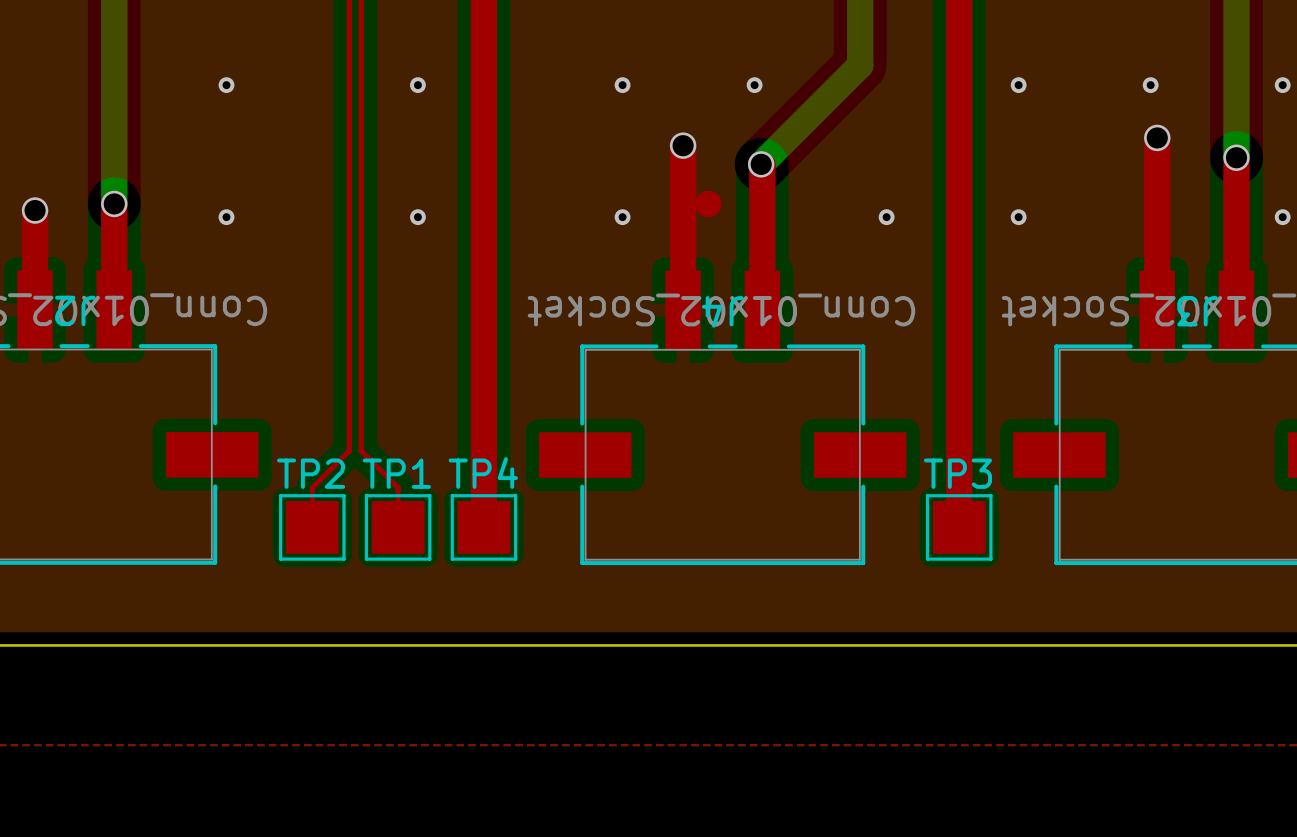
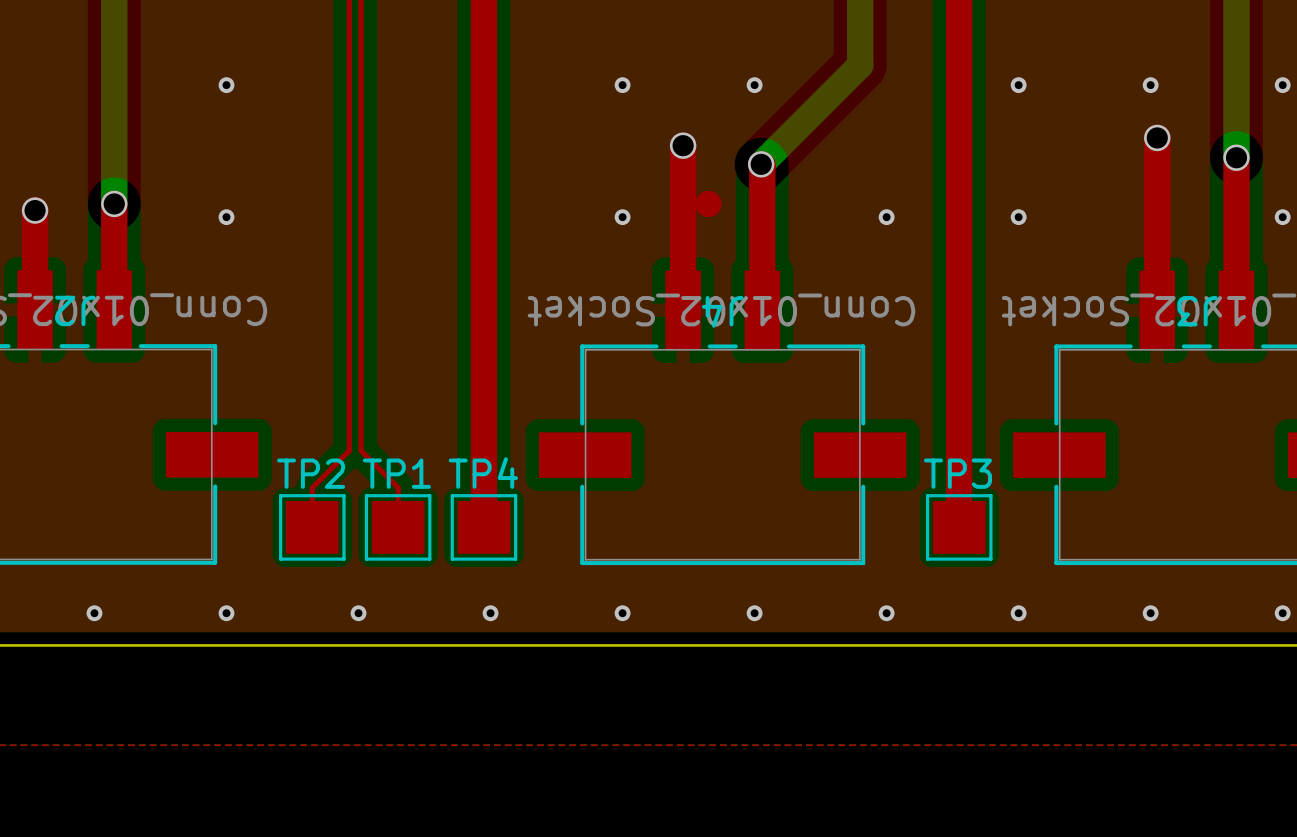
via: (417, 85) -> none
via: (417, 217) -> none
via: none -> (94, 613)
via: none -> (226, 613)
via: none -> (358, 613)
via: none -> (490, 613)
via: none -> (622, 613)
via: none -> (754, 613)
via: none -> (886, 613)
via: none -> (1018, 613)
via: none -> (1150, 613)
via: none -> (1282, 613)

